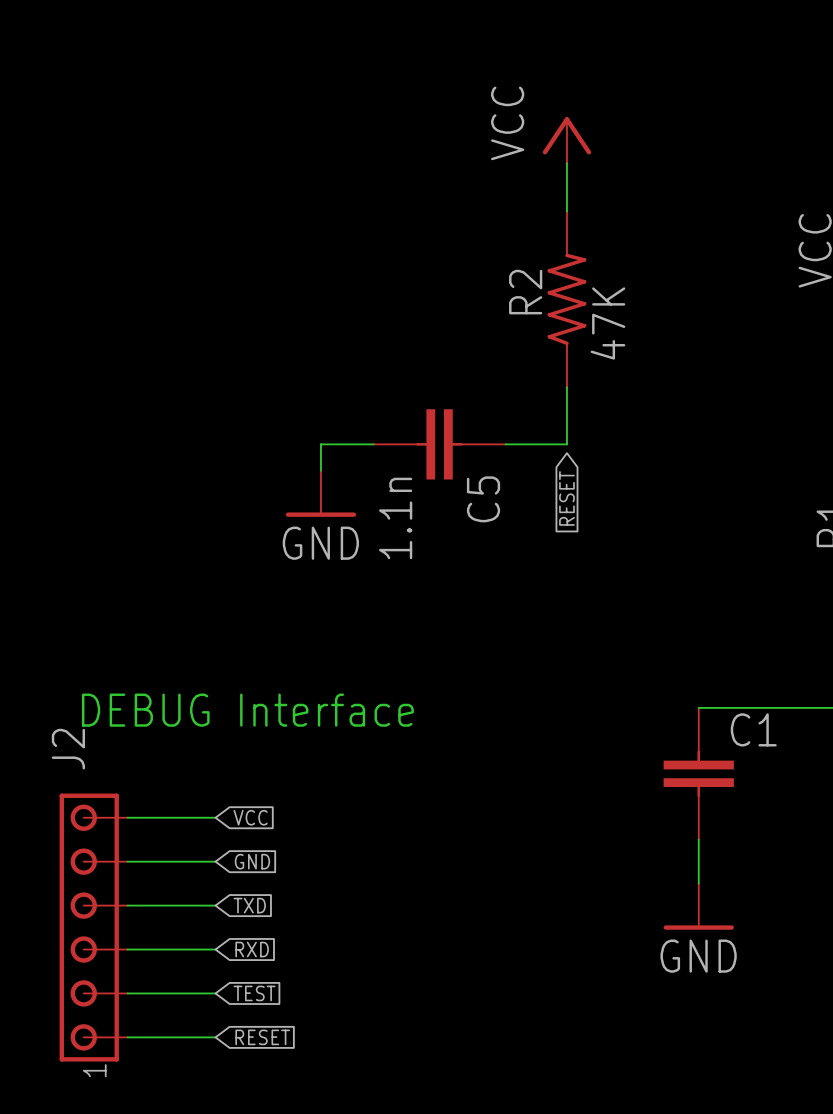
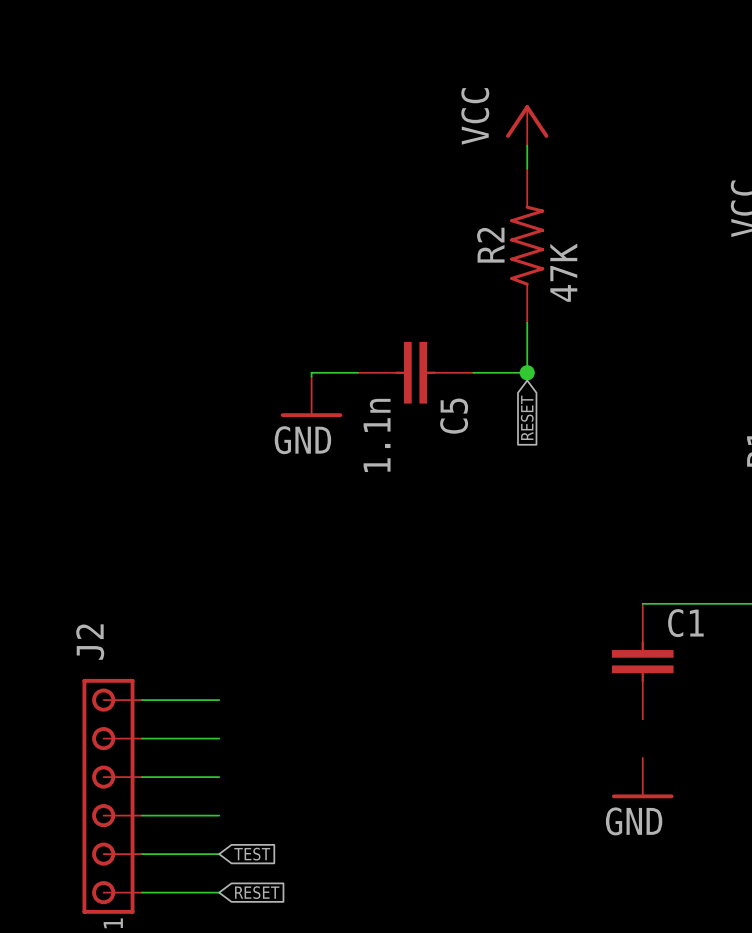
power symbol position: VCC (566, 140) -> VCC (527, 125)
junction: none -> (527, 372)
power symbol position: GND (320, 493) -> GND (311, 396)
text: DEBUG Interface (247, 710) -> none
global label: VCC (250, 817) -> none
wire: (698, 839) (698, 883) -> none
global label: GND (252, 861) -> none
global label: TXD (249, 905) -> none
global label: RXD (252, 949) -> none

